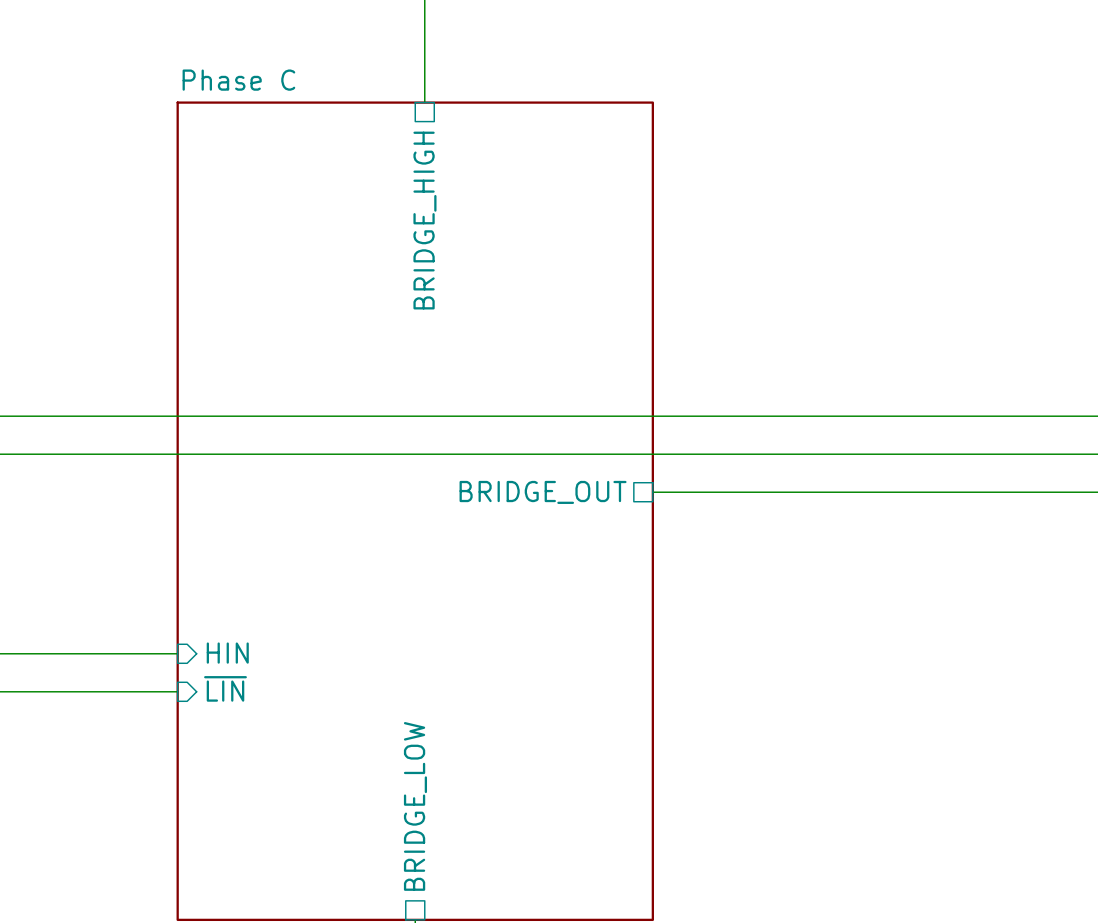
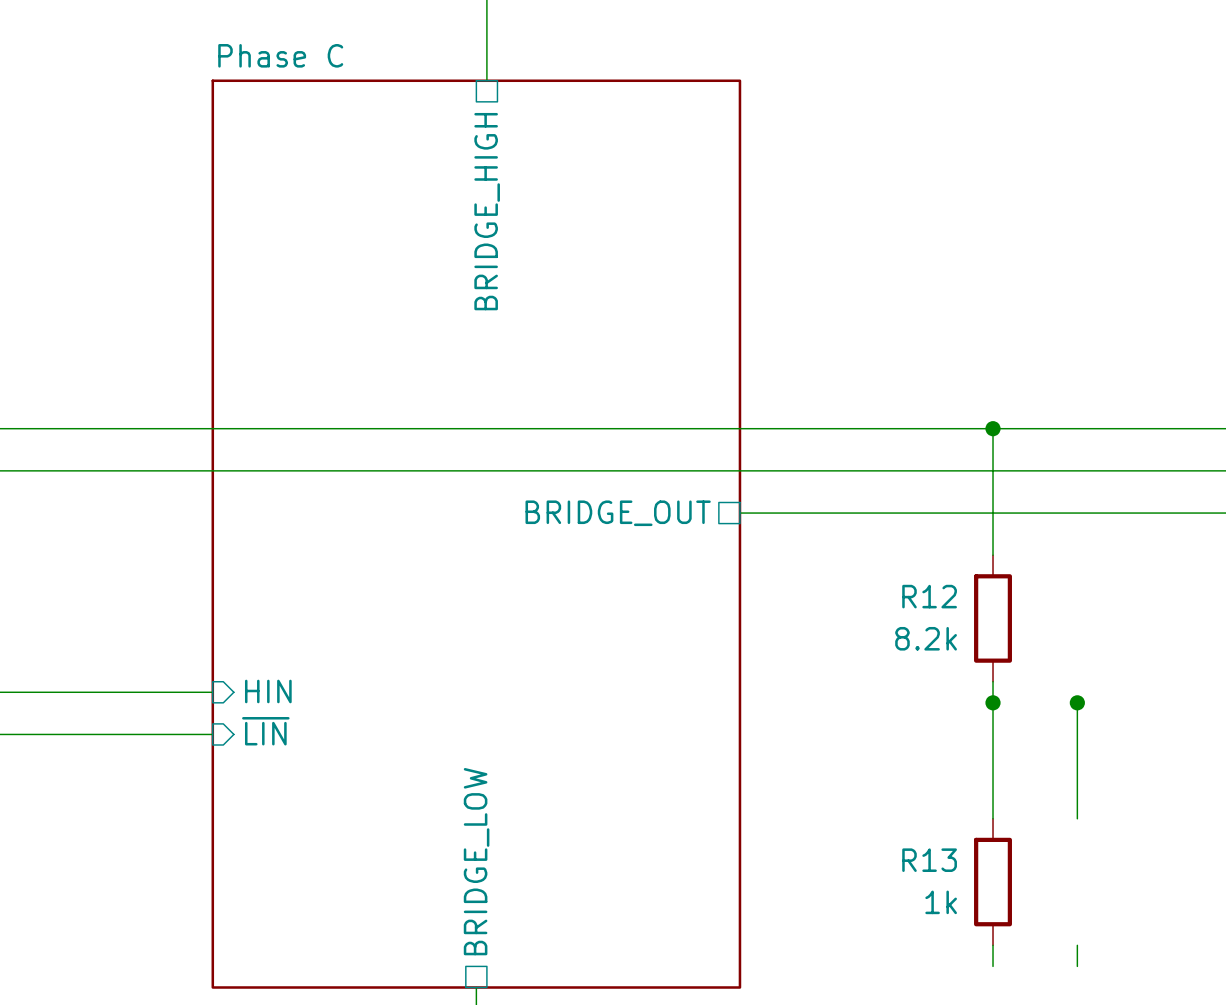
wire: none -> (993, 428) (993, 555)
junction: none -> (993, 428)
R12: none -> 8.2k (993, 618)
wire: none -> (993, 681) (993, 818)
junction: none -> (993, 702)
wire: none -> (1077, 702) (1077, 818)
junction: none -> (1077, 702)
R13: none -> 1k (993, 882)
wire: none -> (993, 945) (993, 966)
wire: none -> (1077, 945) (1077, 966)

